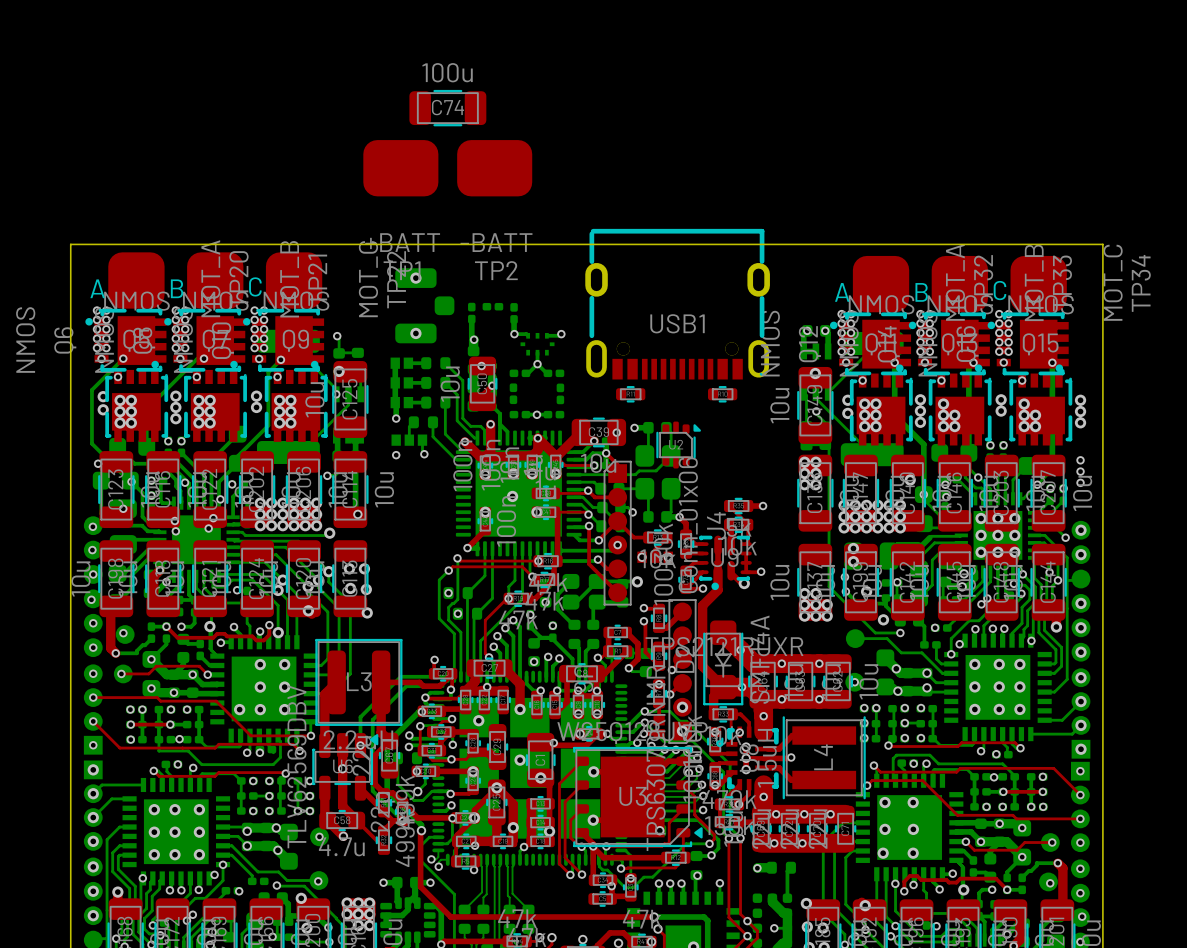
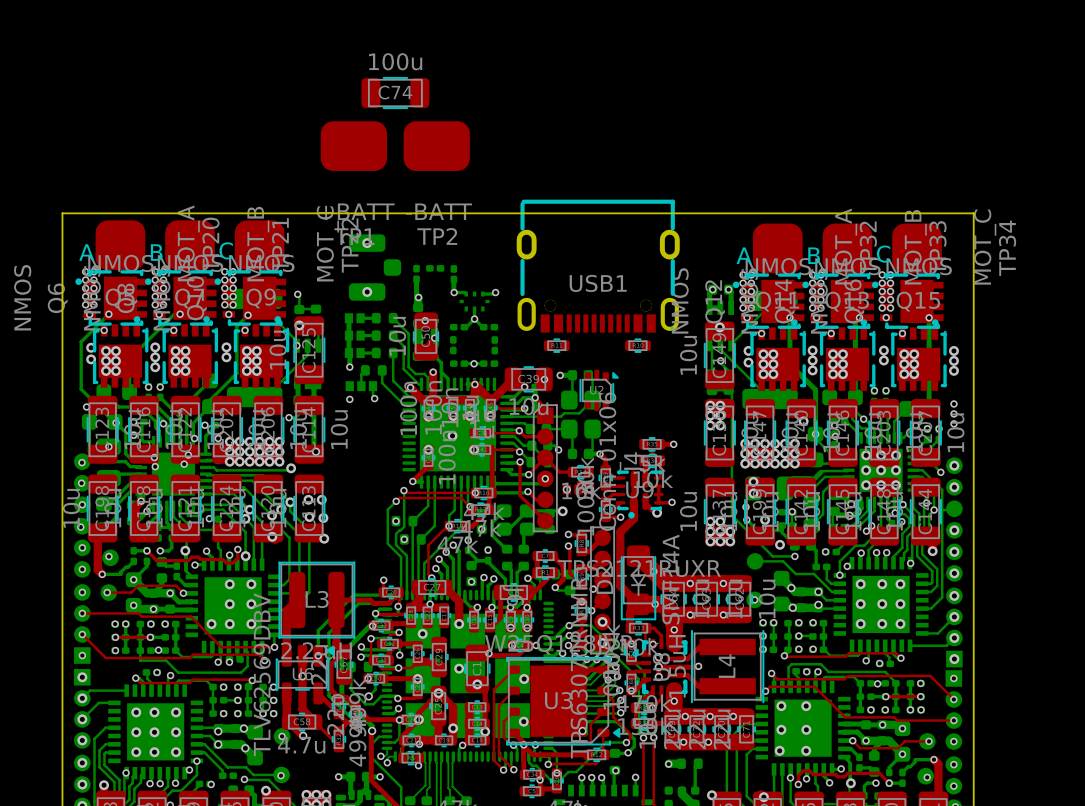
via: none -> (842, 354)
via: none -> (914, 354)

